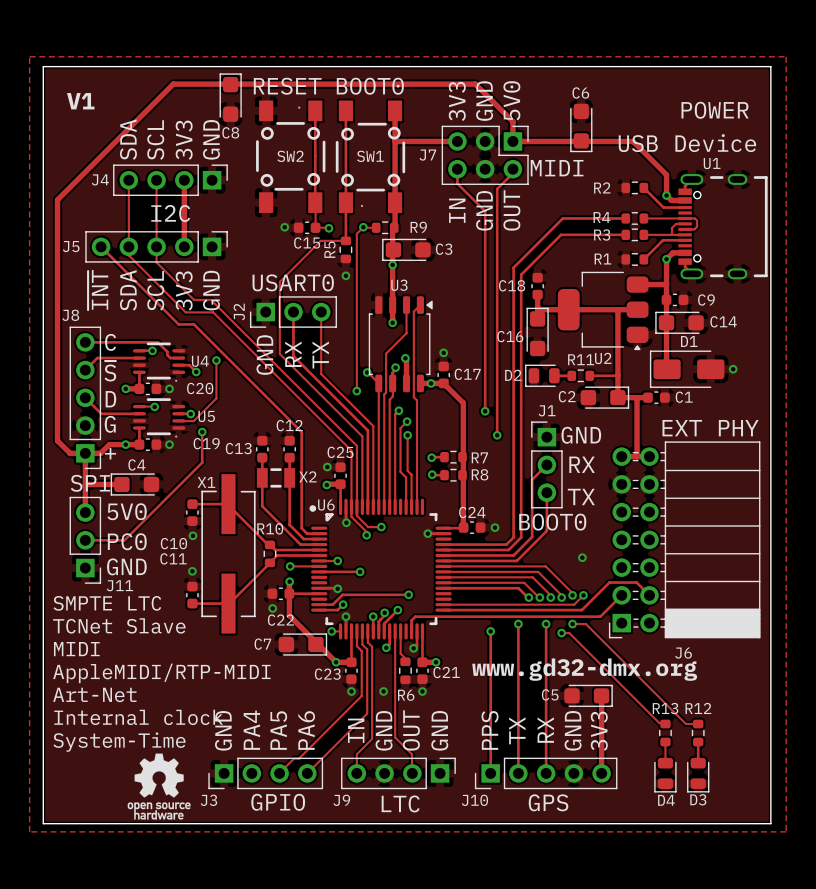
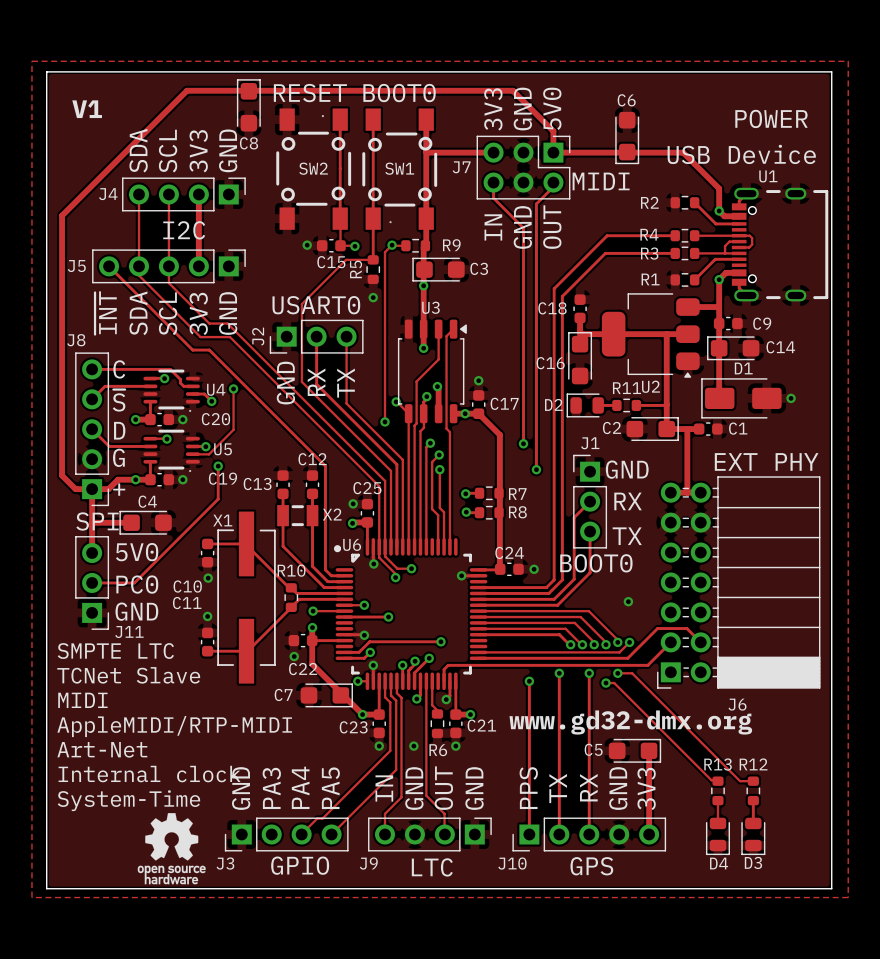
text: PA4 (251, 730) -> PA3 (271, 788)
text: PA5 (278, 730) -> PA4 (300, 787)
text: PA6 (306, 730) -> PA5 (330, 788)

